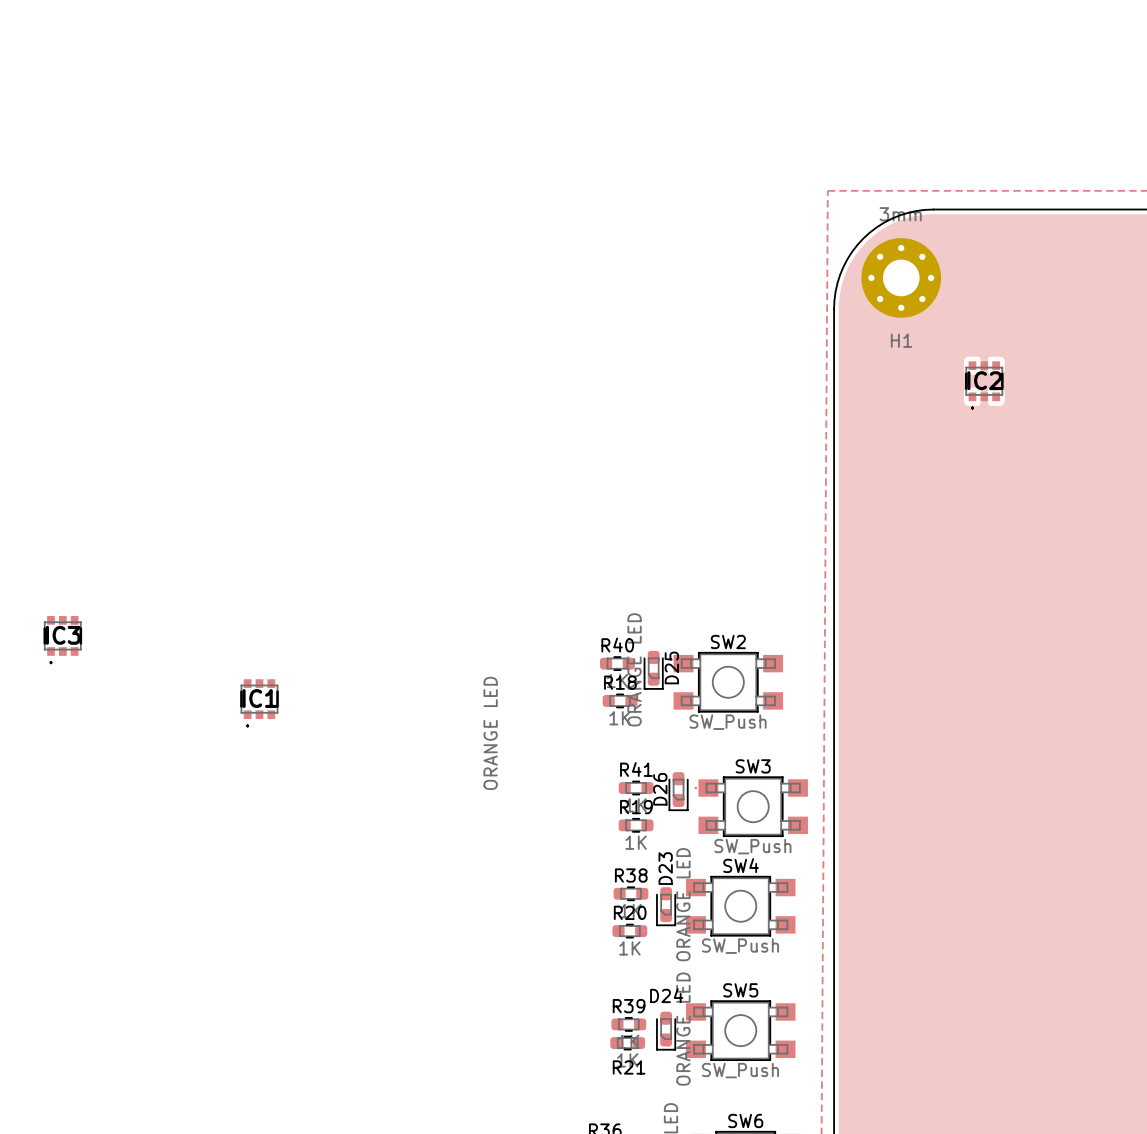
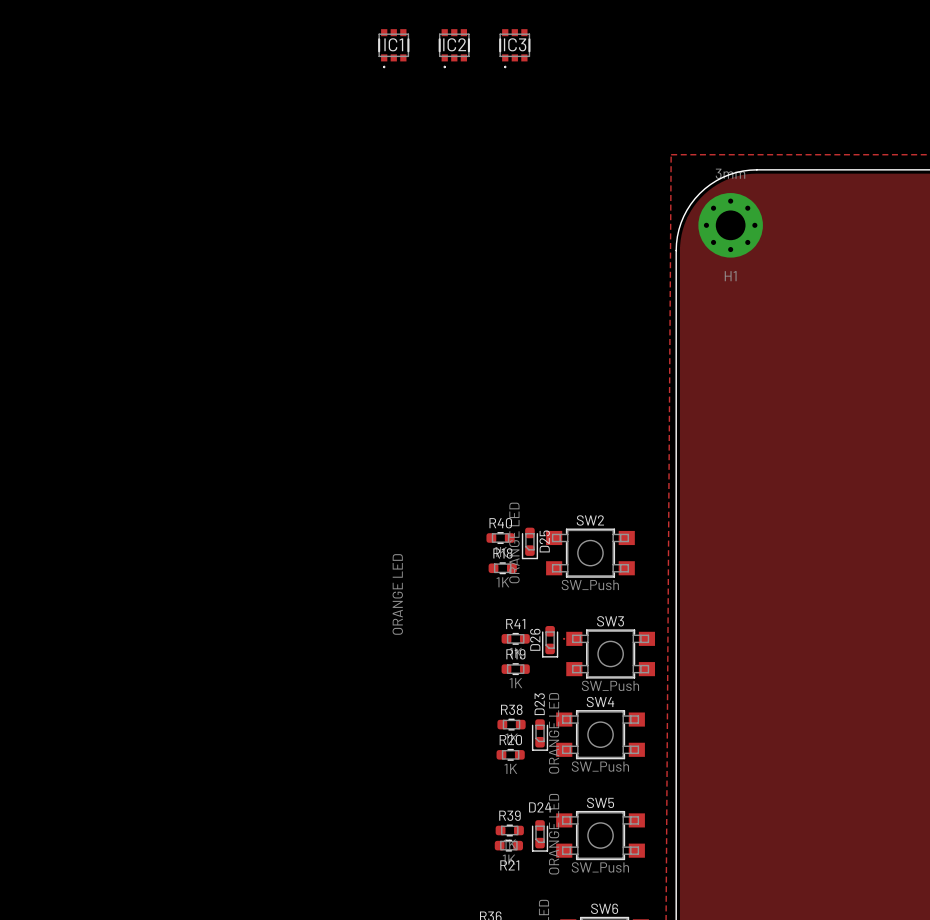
IC2 position: (984, 385) -> (454, 48)
IC3 position: (62, 639) -> (514, 48)
IC1 position: (259, 703) -> (393, 48)

